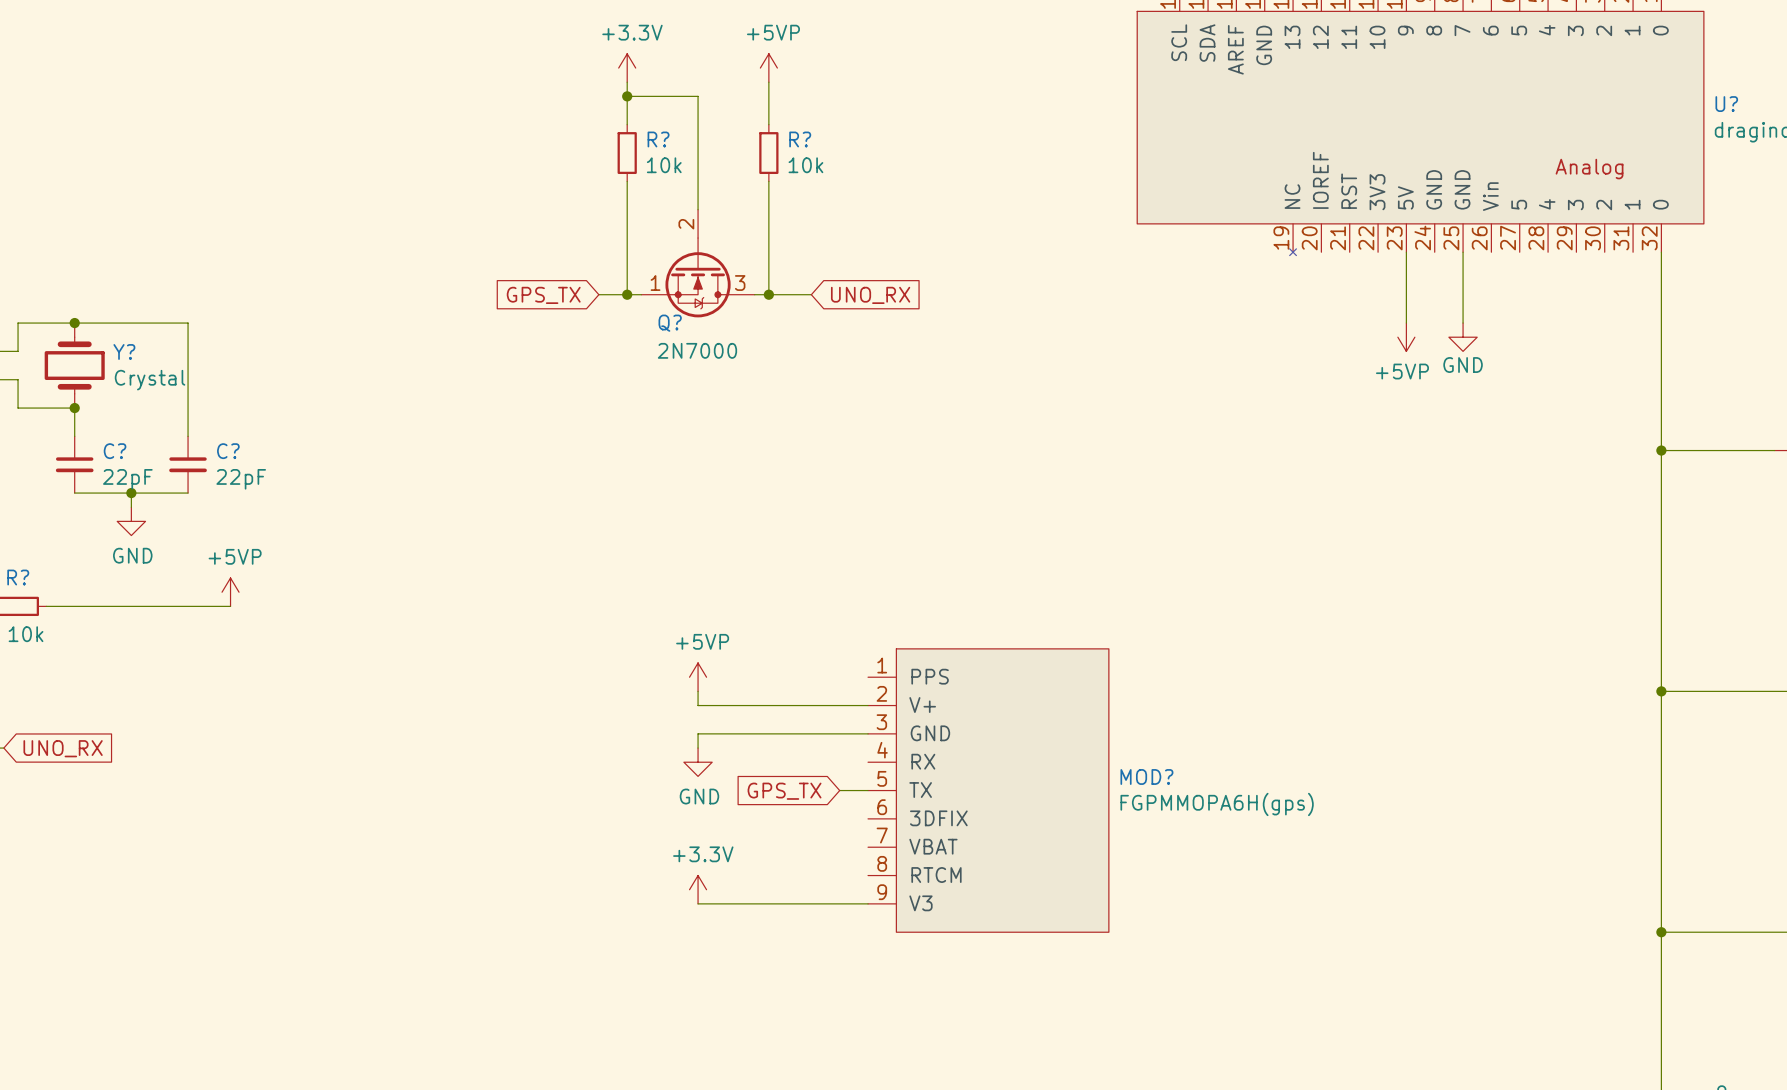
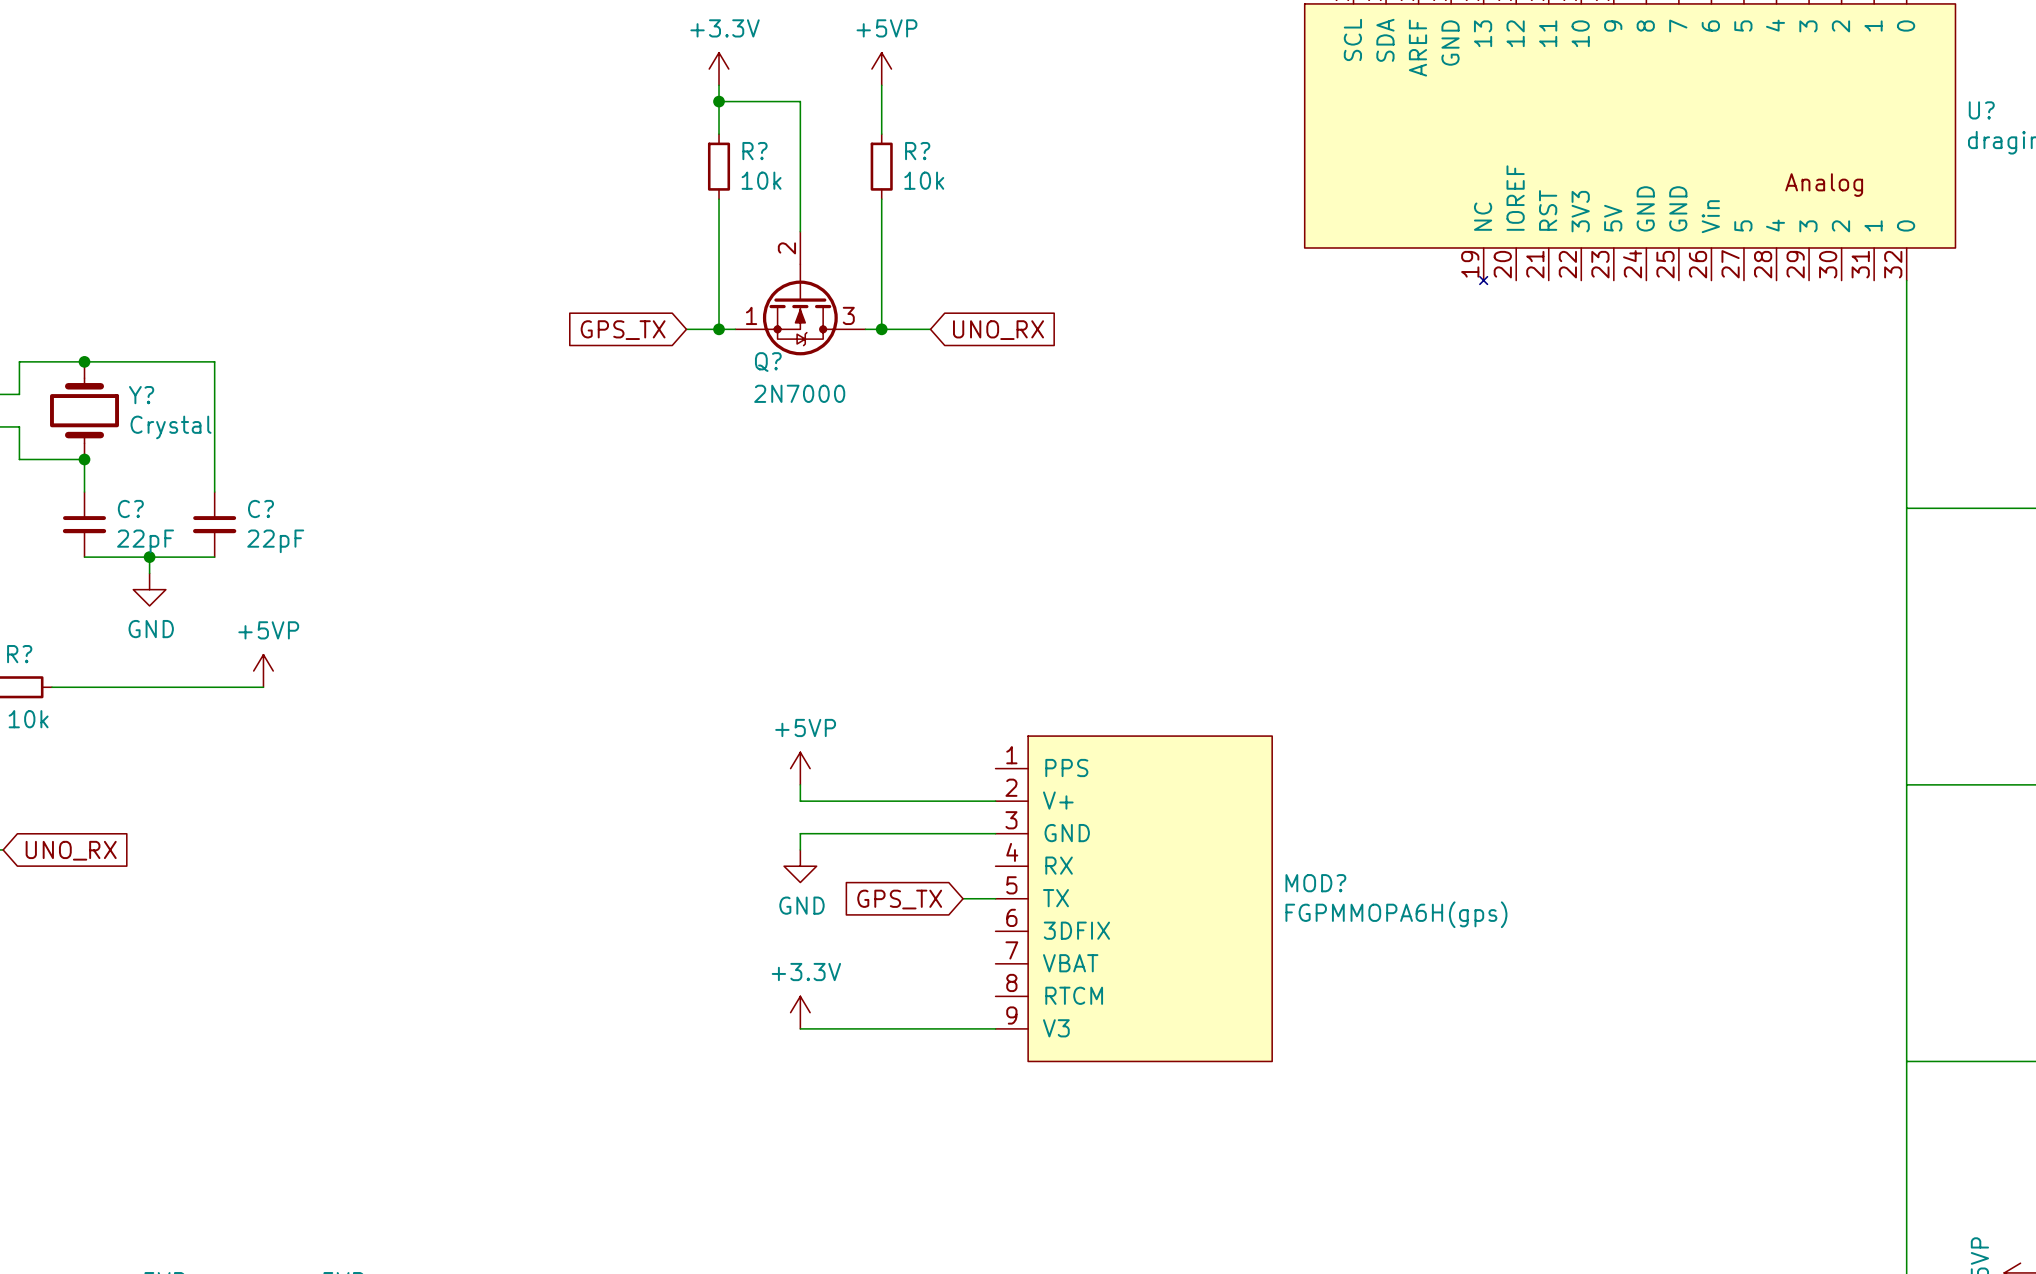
wire: (1406, 252) (1406, 323) -> none
wire: (1463, 252) (1463, 323) -> none
power symbol: +5VP (1406, 337) -> none
power symbol: GND (1463, 337) -> none
junction: (1661, 450) -> none
junction: (1661, 691) -> none
junction: (1661, 932) -> none

